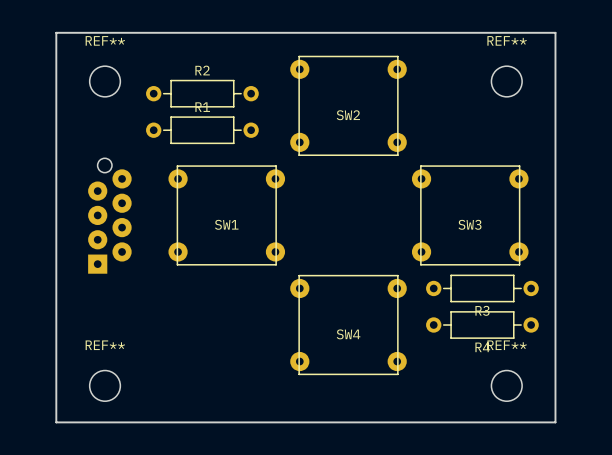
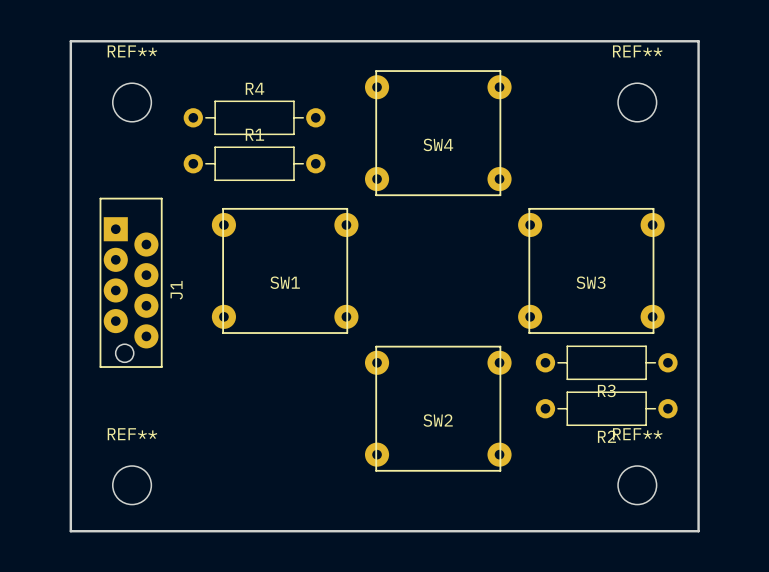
R2 name: R2 (202, 70) -> R4 (255, 88)
SW2 name: SW2 (348, 115) -> SW4 (438, 144)
J1 side: bottom (109, 216) -> top (131, 282)
SW4 name: SW4 (348, 334) -> SW2 (438, 420)
R4 name: R4 (482, 347) -> R2 (606, 436)

